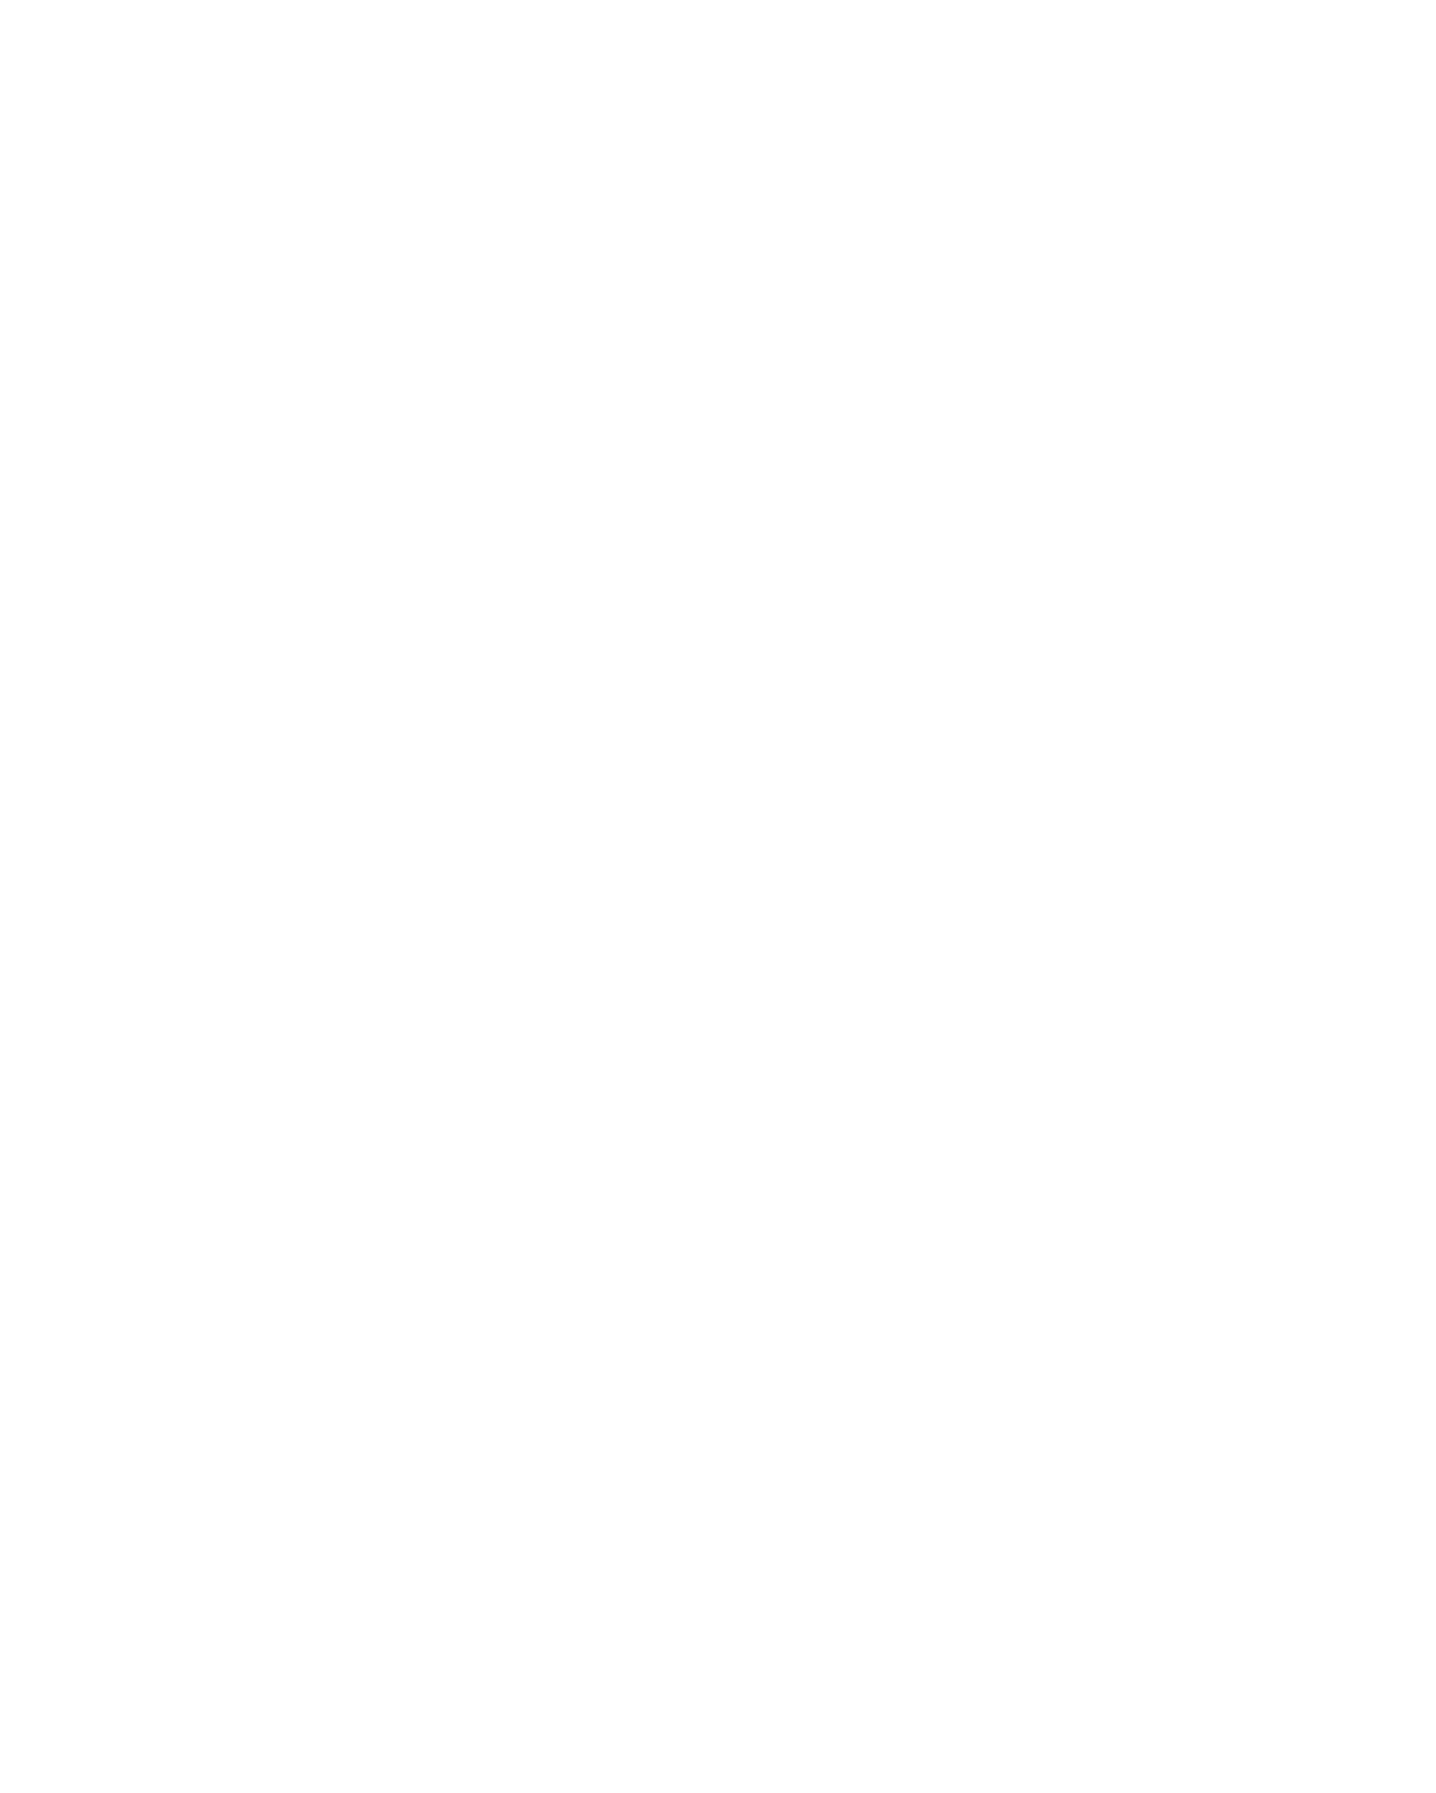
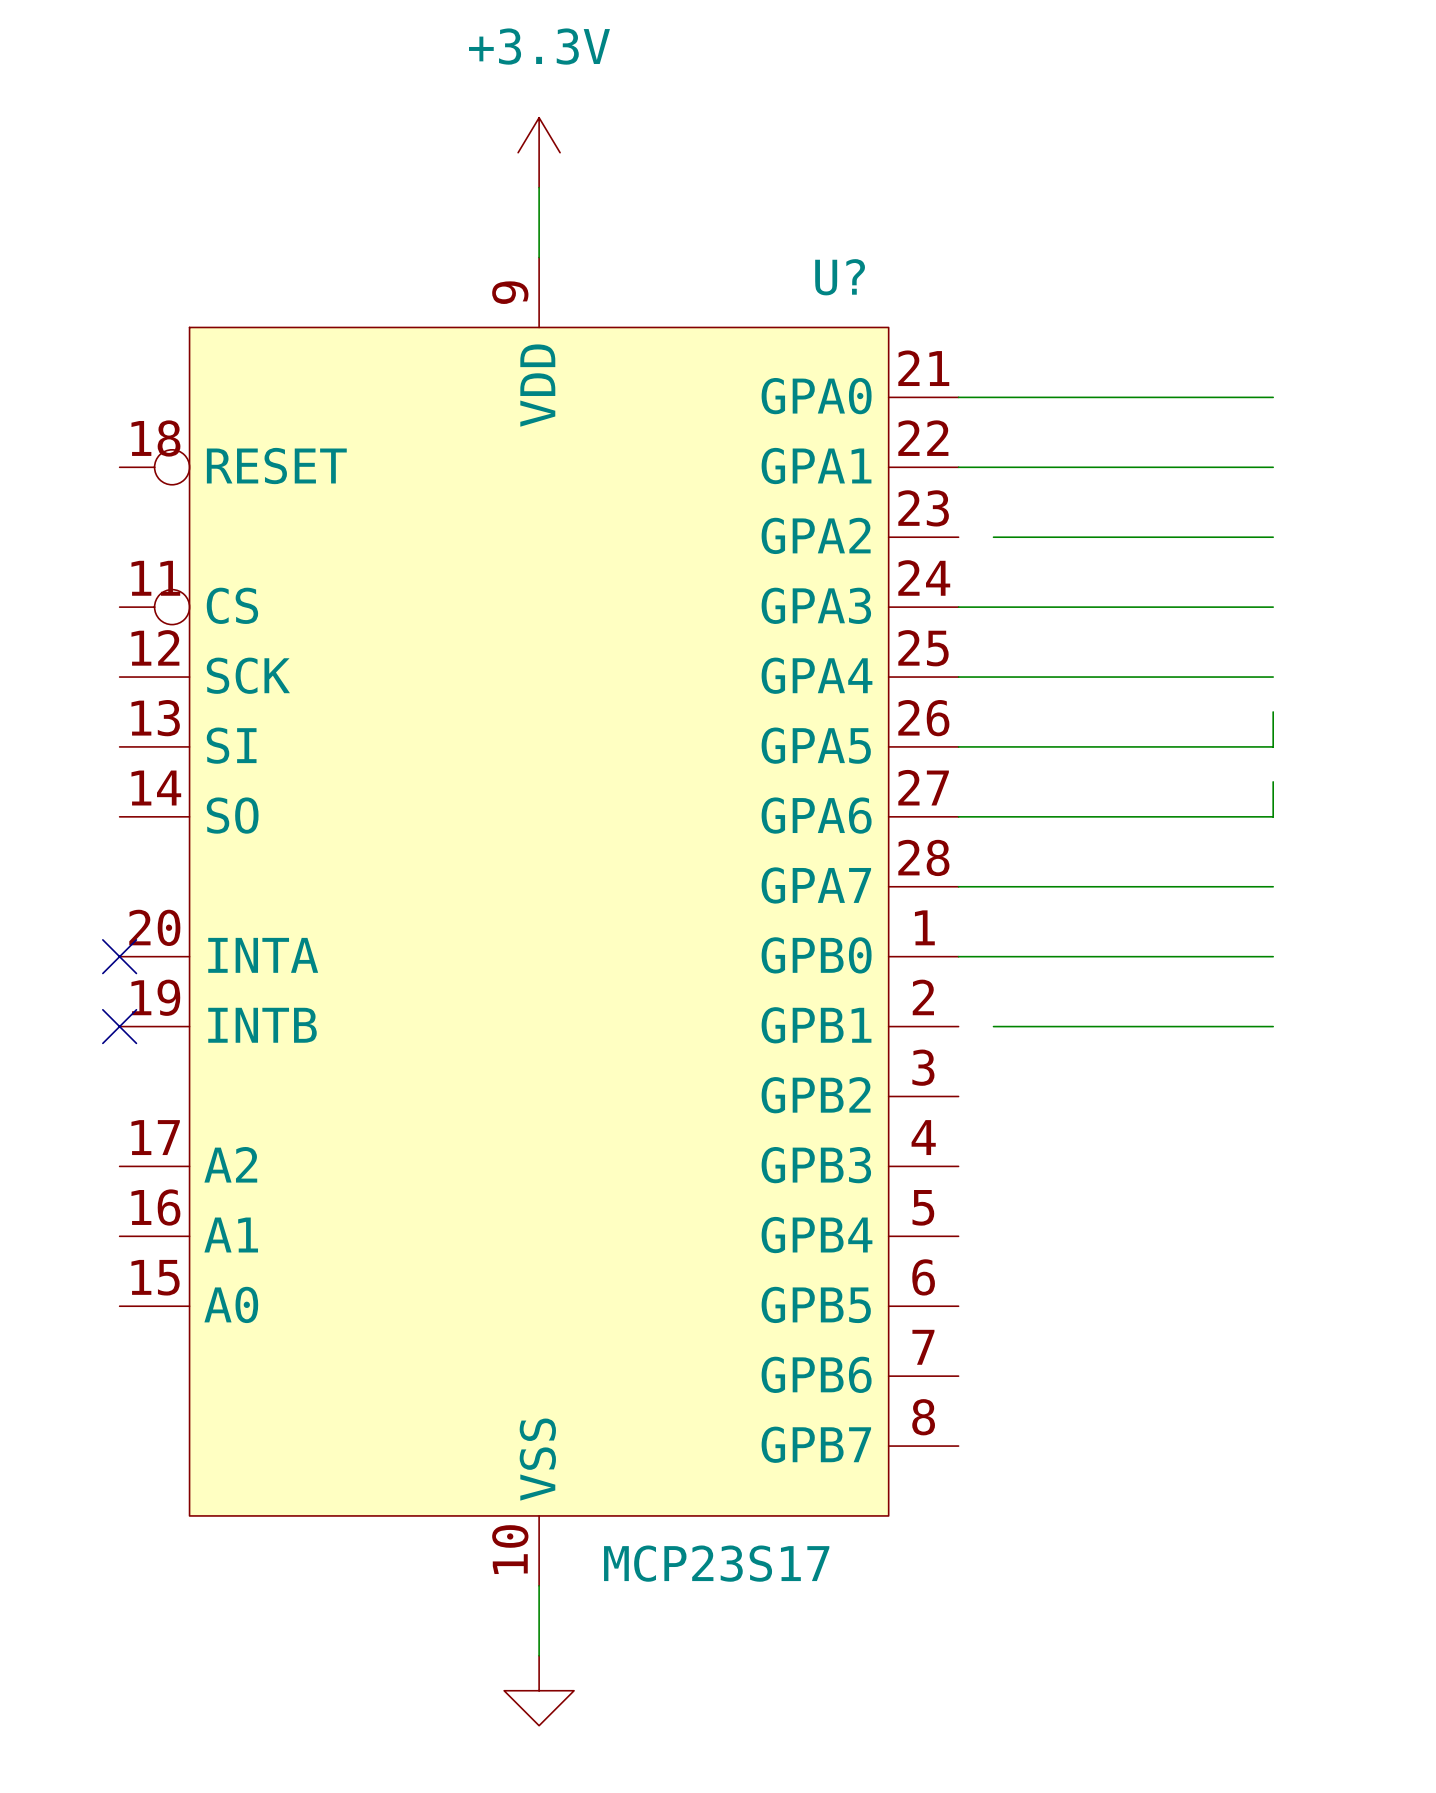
power symbol: none -> +3.3V (539, 152)
wire: none -> (539, 187) (539, 257)
wire: none -> (958, 397) (1273, 397)
wire: none -> (958, 467) (1273, 467)
wire: none -> (993, 537) (1273, 537)
wire: none -> (958, 607) (1273, 607)
wire: none -> (958, 677) (1273, 677)
wire: none -> (1273, 711) (1273, 746) (958, 746)
wire: none -> (1273, 781) (1273, 816) (958, 816)
wire: none -> (958, 886) (1273, 886)
U?: none -> MCP23S17 (539, 921)
no-connect mark: none -> (119, 956)
wire: none -> (958, 956) (1273, 956)
no-connect mark: none -> (119, 1026)
wire: none -> (993, 1026) (1273, 1026)
wire: none -> (539, 1585) (539, 1655)
power symbol: none -> (539, 1690)

